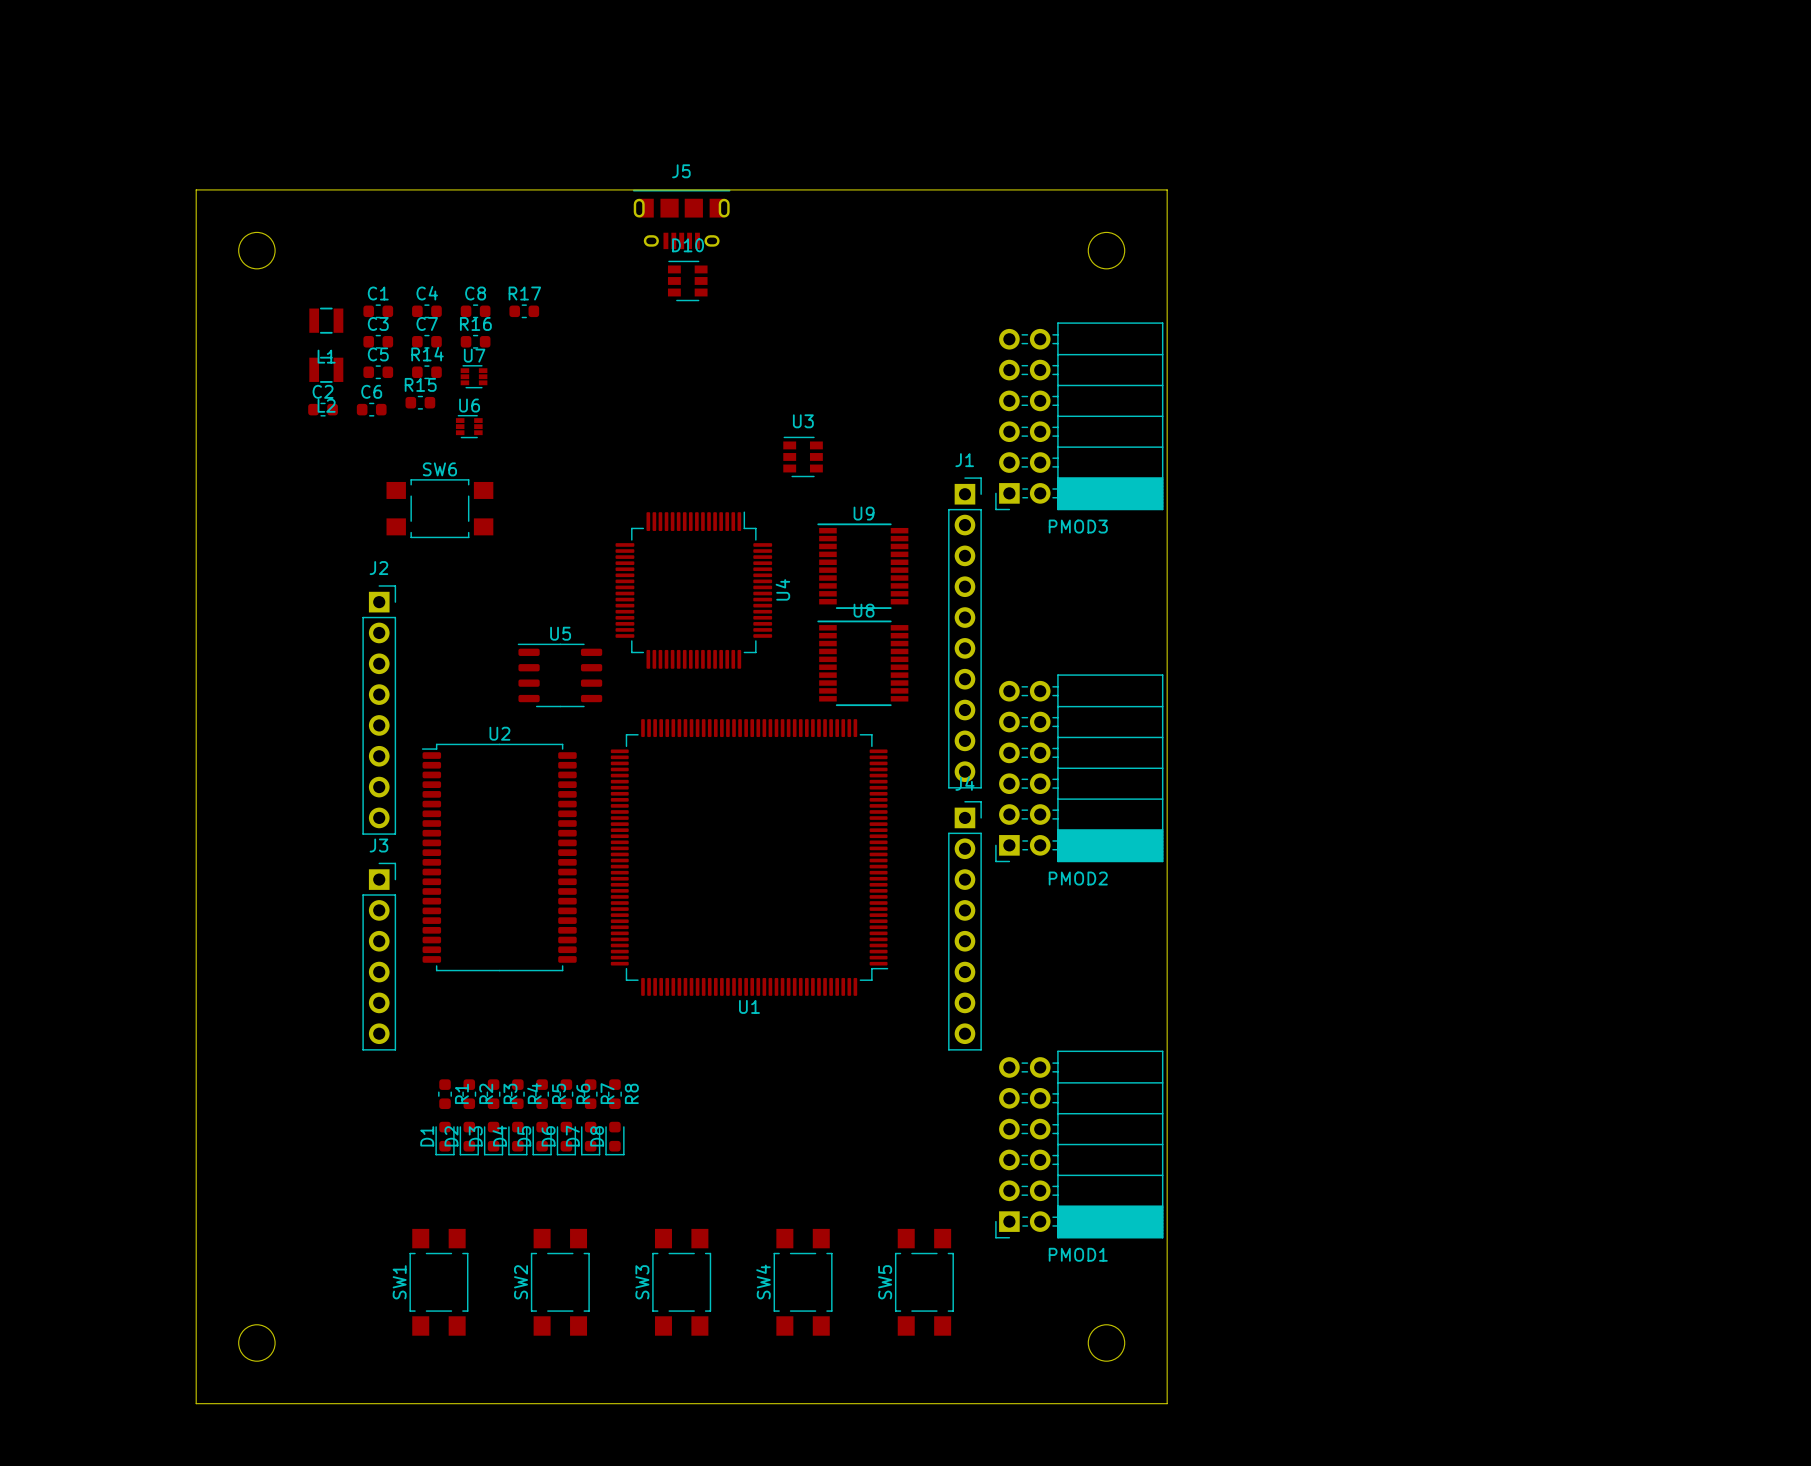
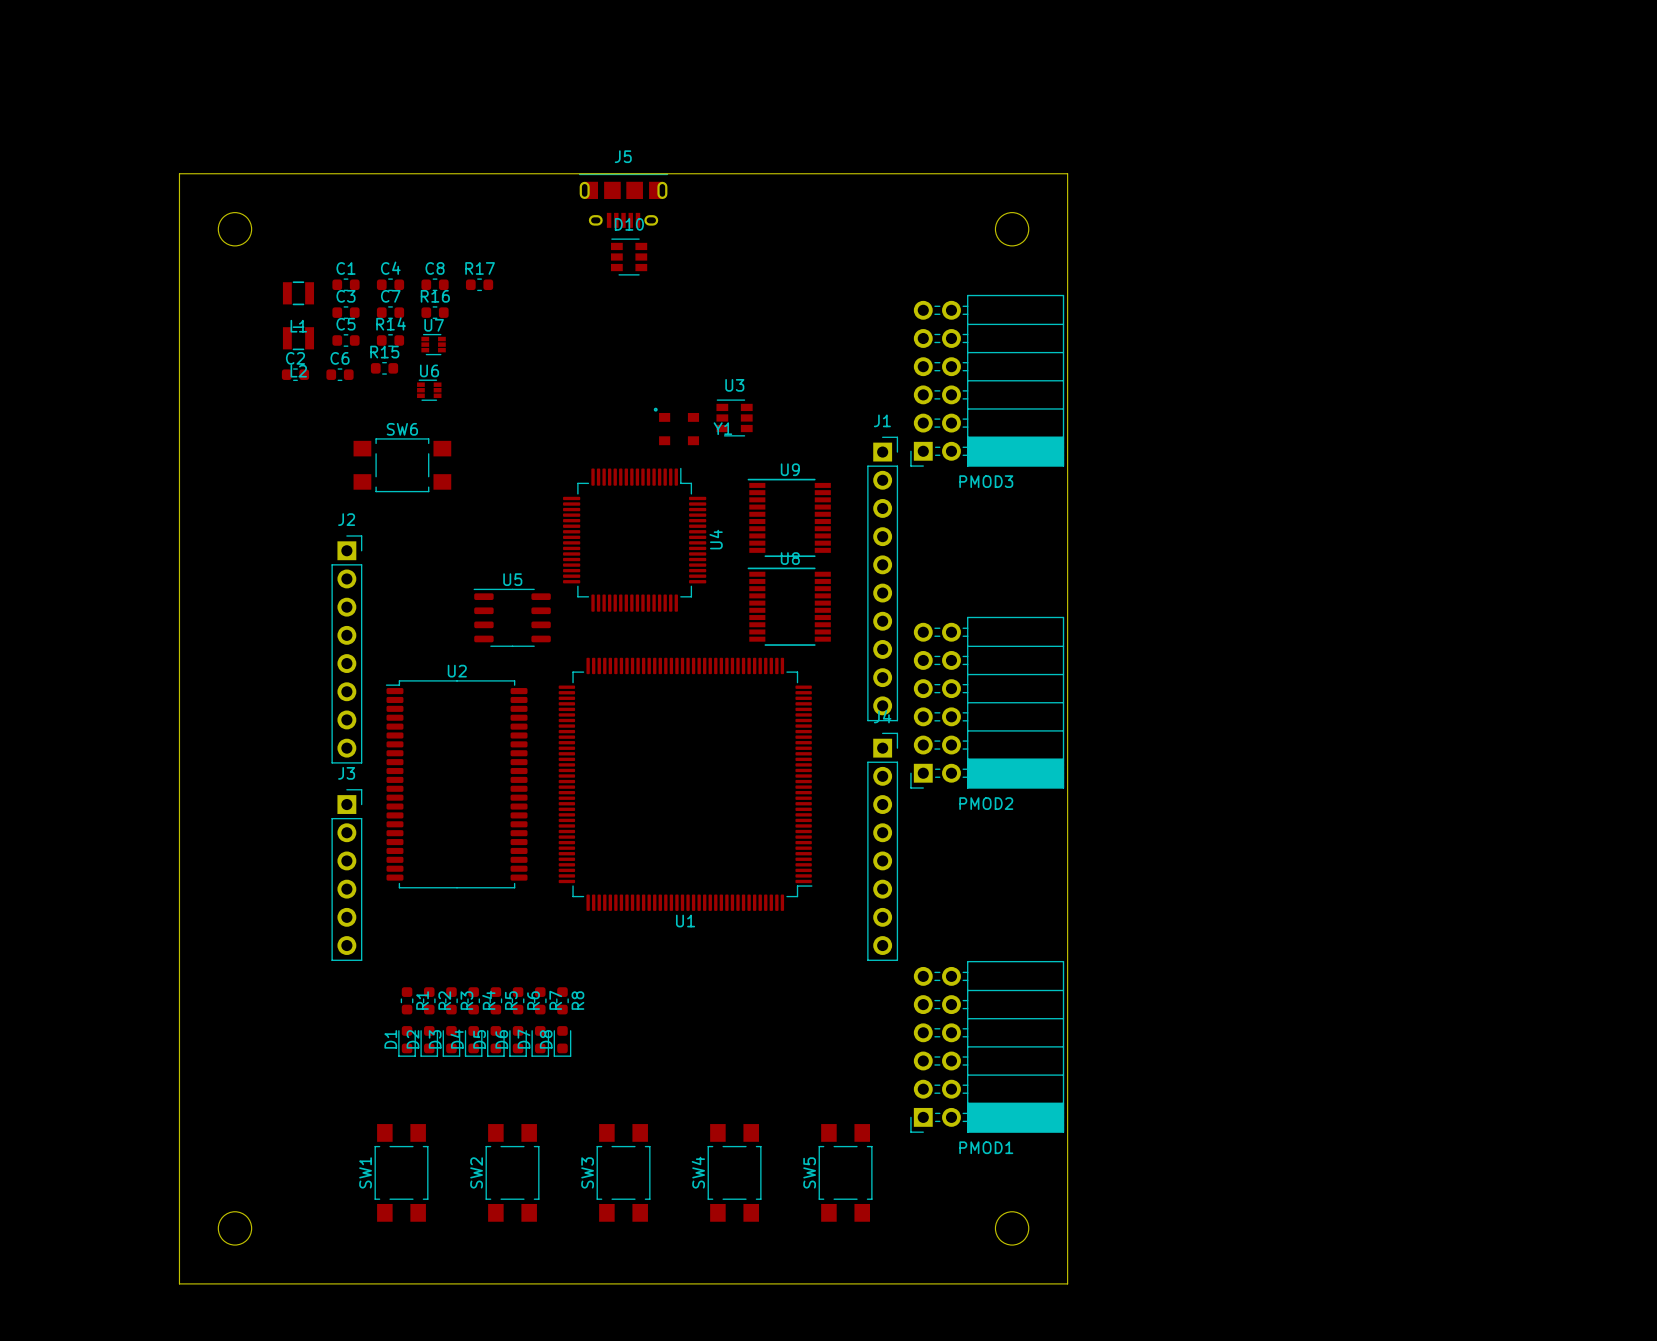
Y1: none -> (676, 426)

